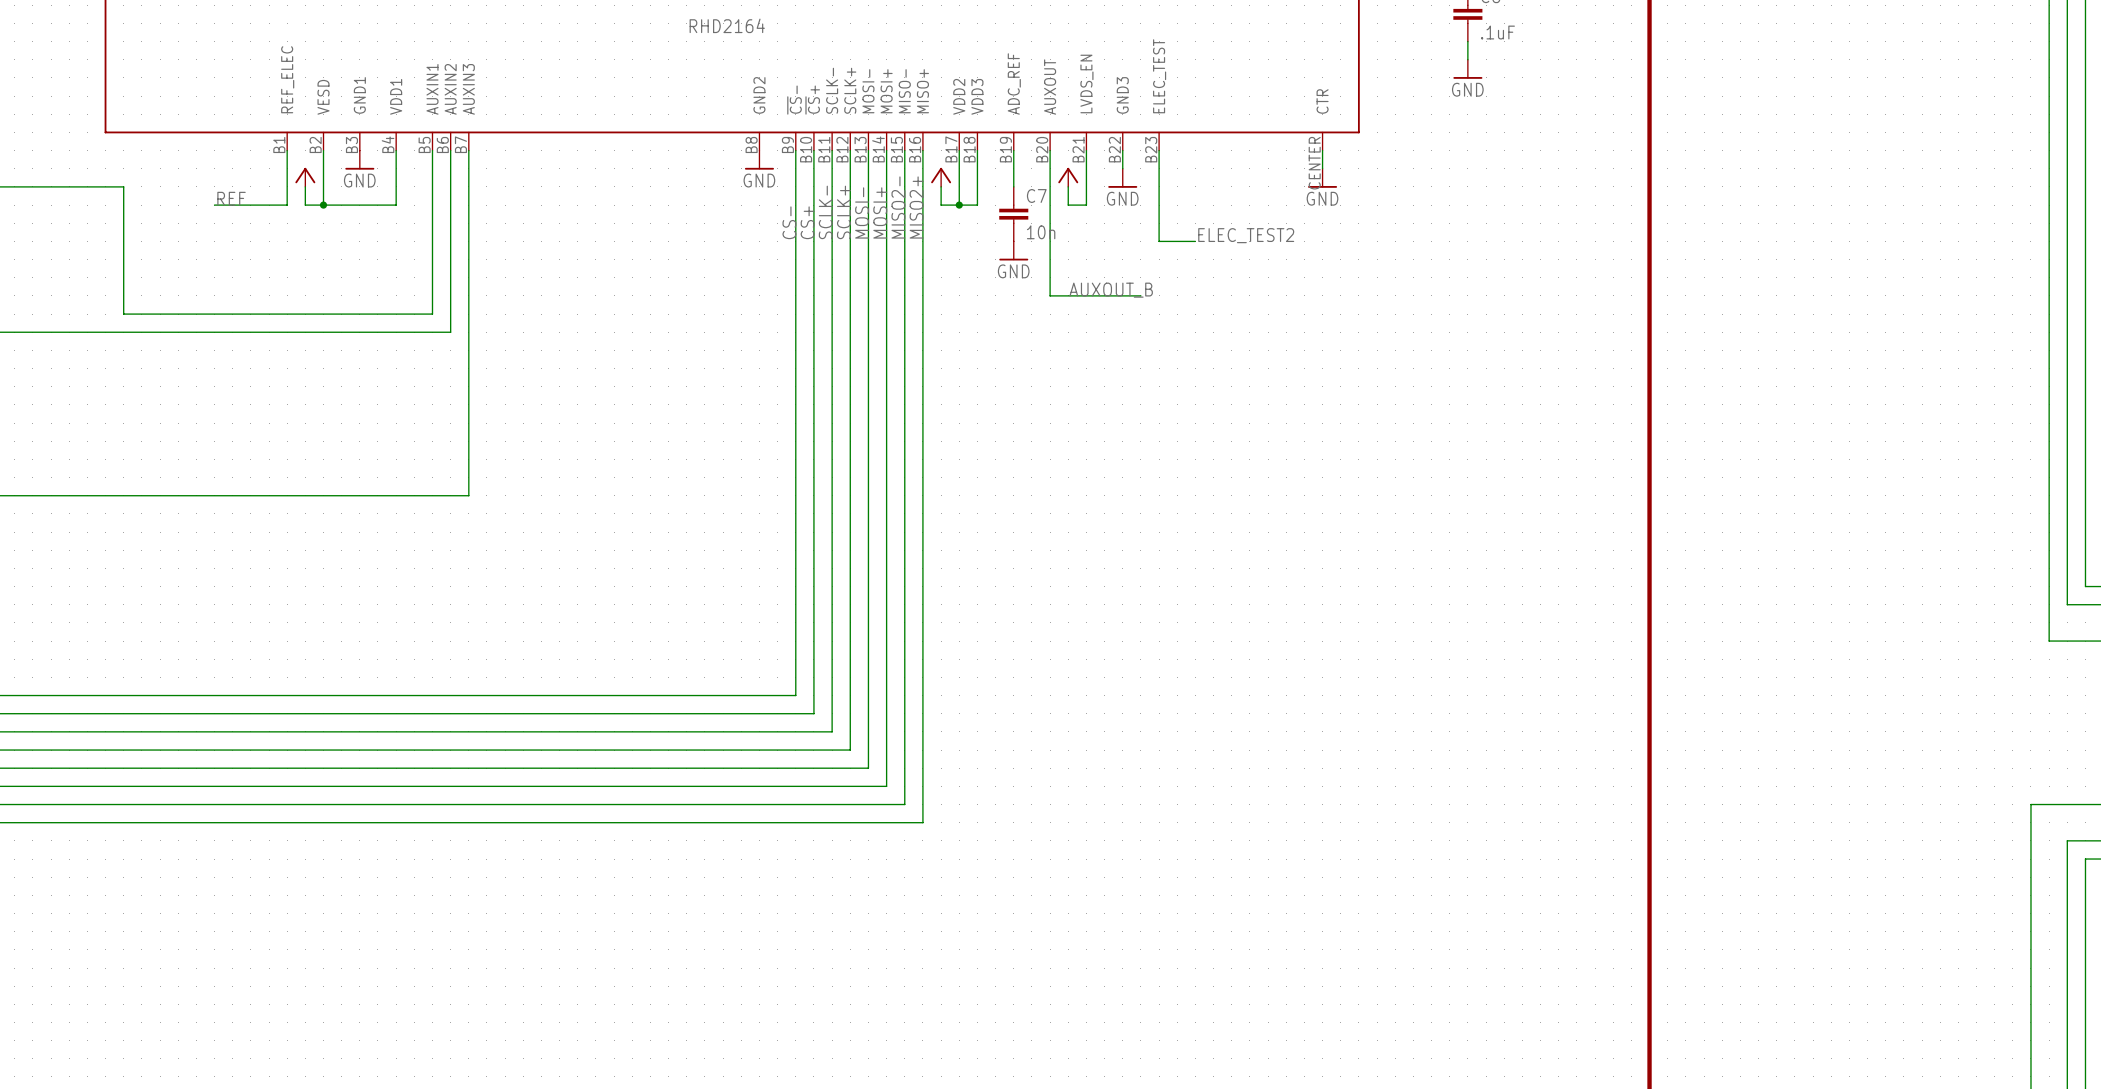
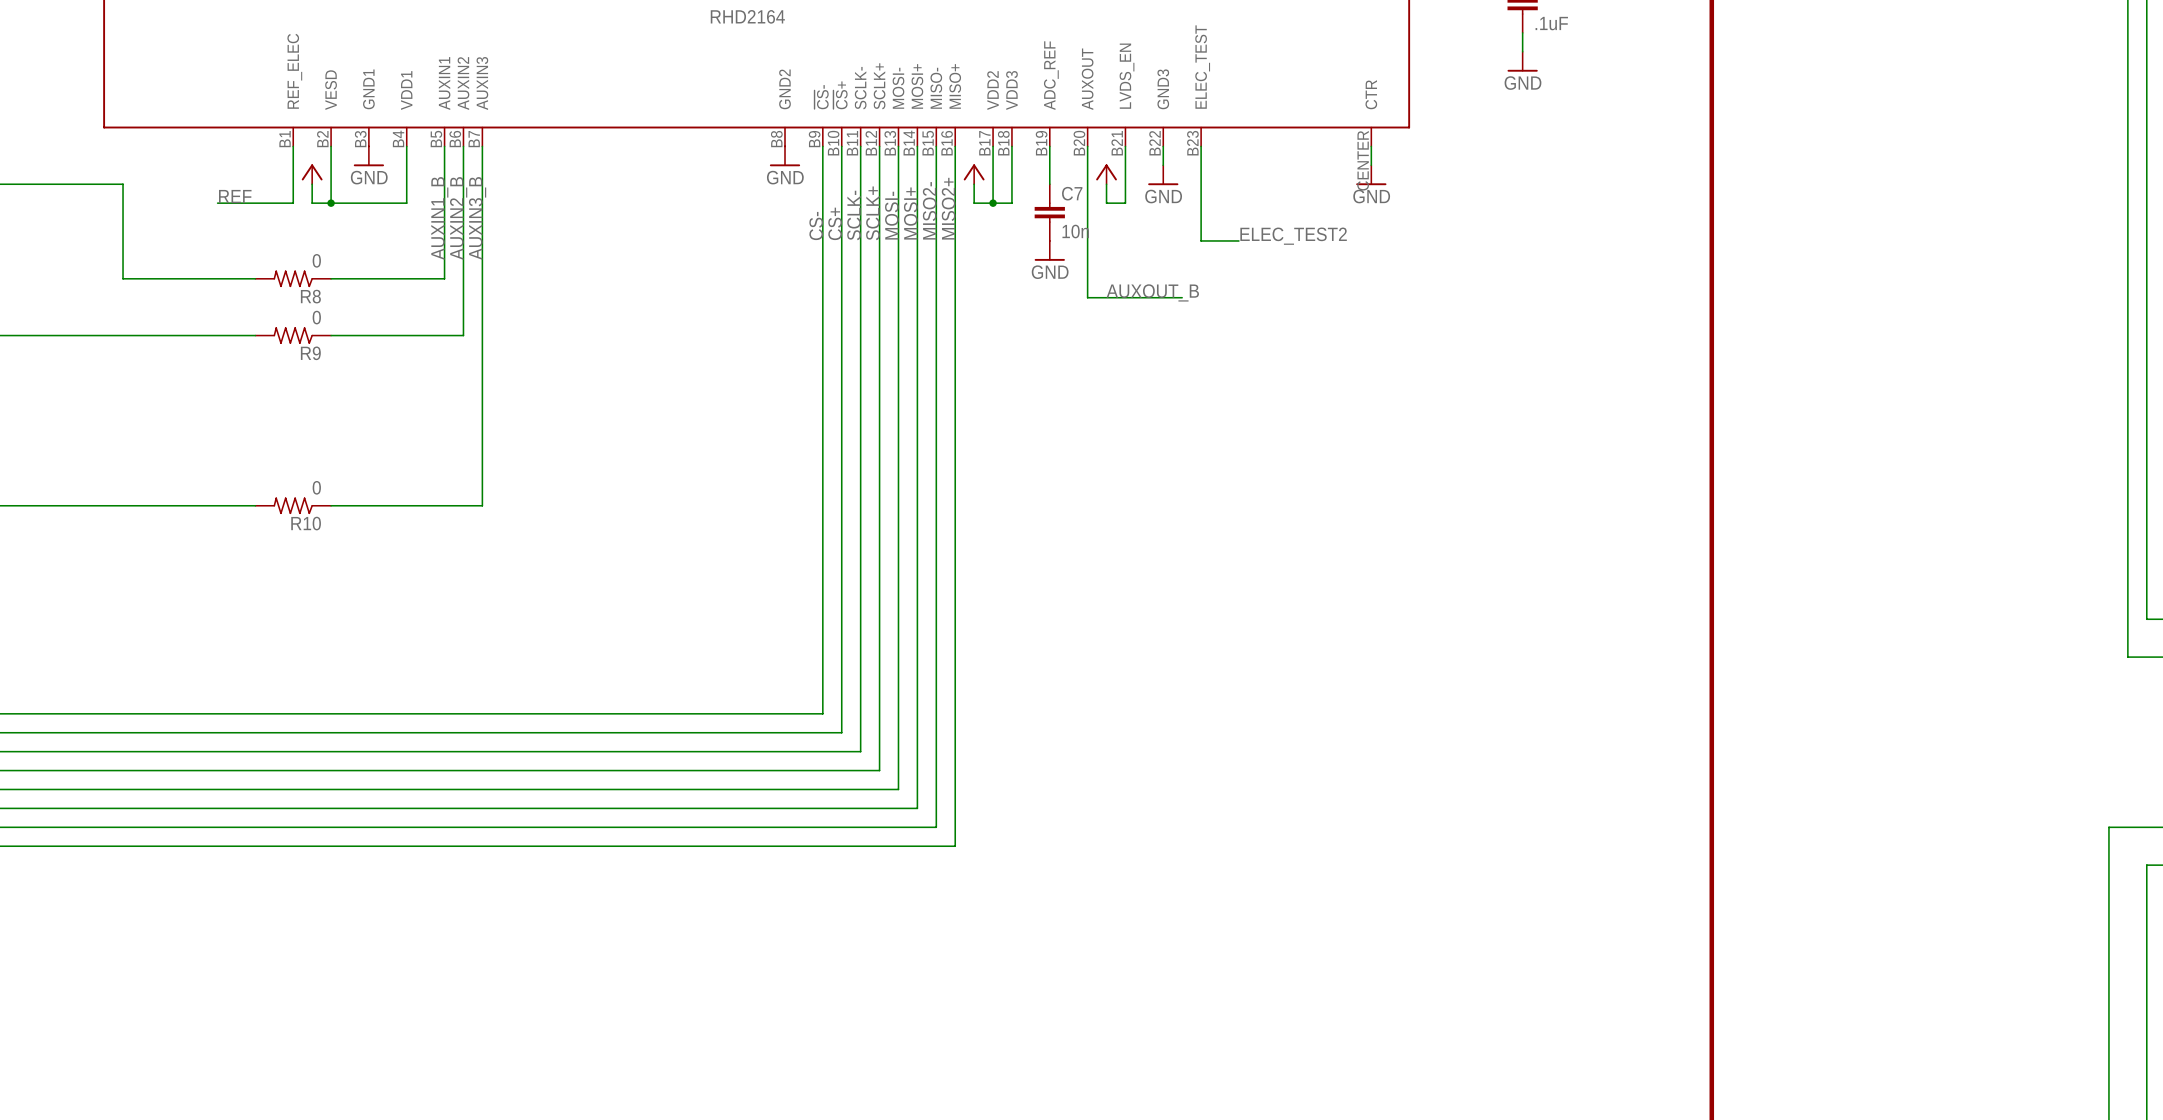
label: none -> AUXIN1_B (439, 218)
label: none -> AUXIN2_B (458, 218)
label: none -> AUXIN3_B (477, 218)
wire: (123, 277) (123, 314) (432, 314) (432, 277) -> (123, 278) (255, 278)
R8: none -> 0 (293, 278)
wire: none -> (331, 278) (444, 278)
R9: none -> 0 (293, 335)
R10: none -> 0 (293, 505)

